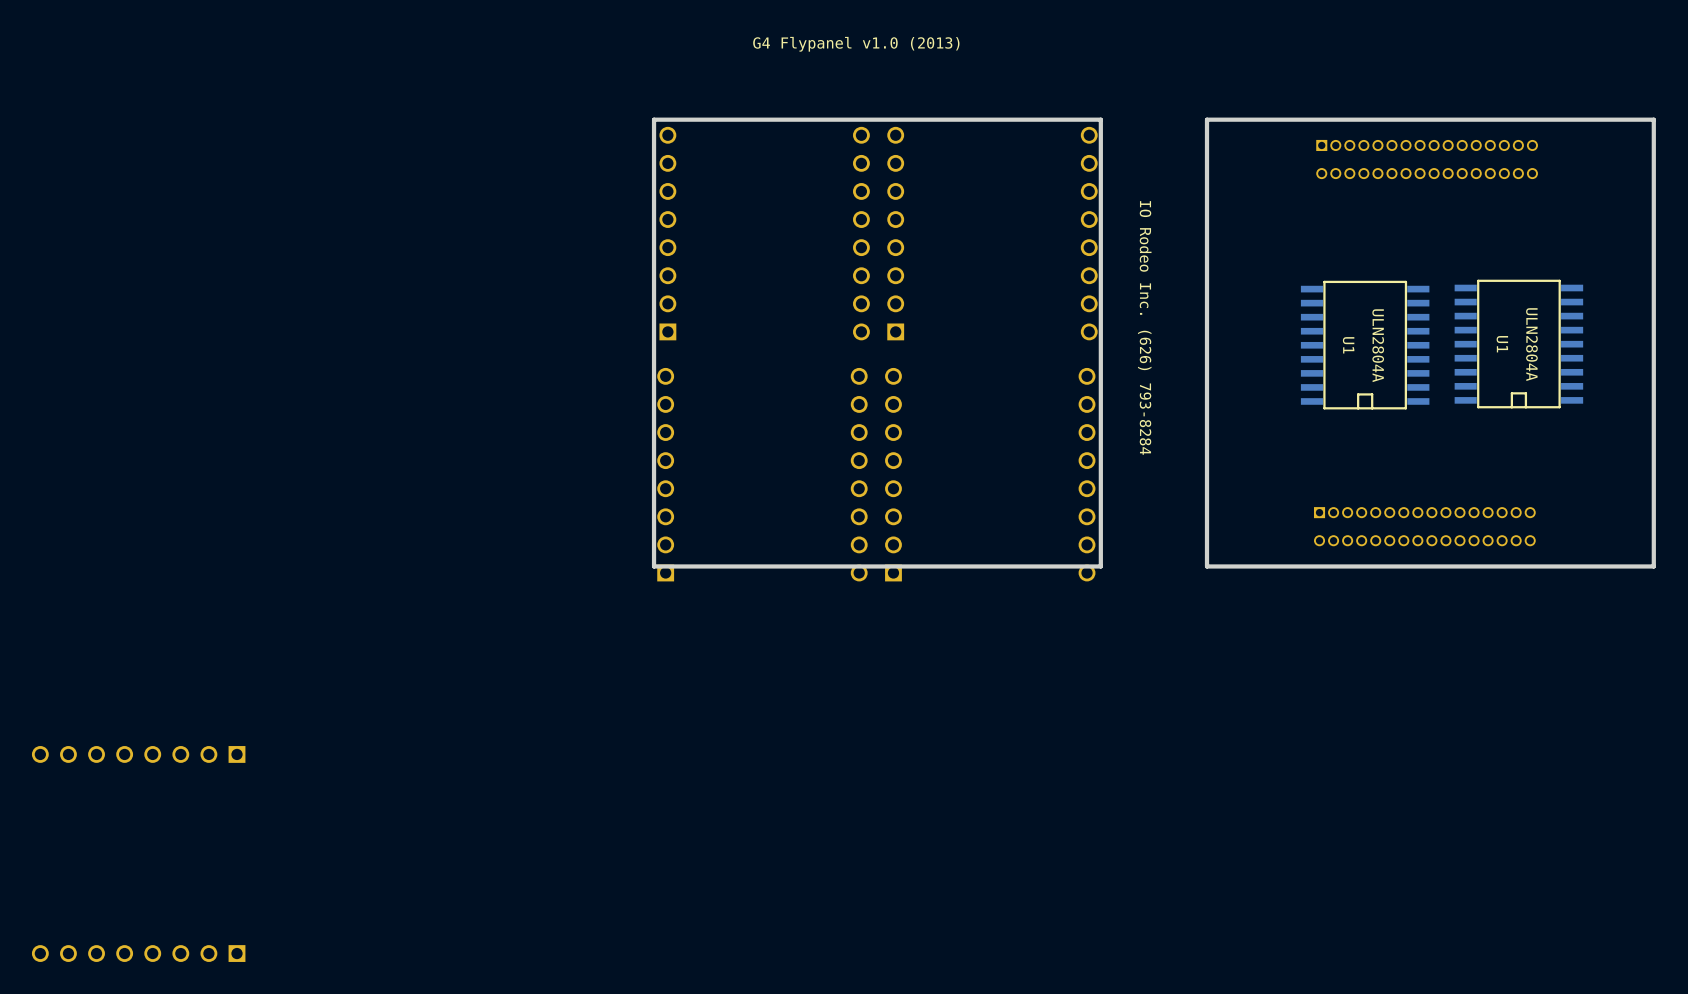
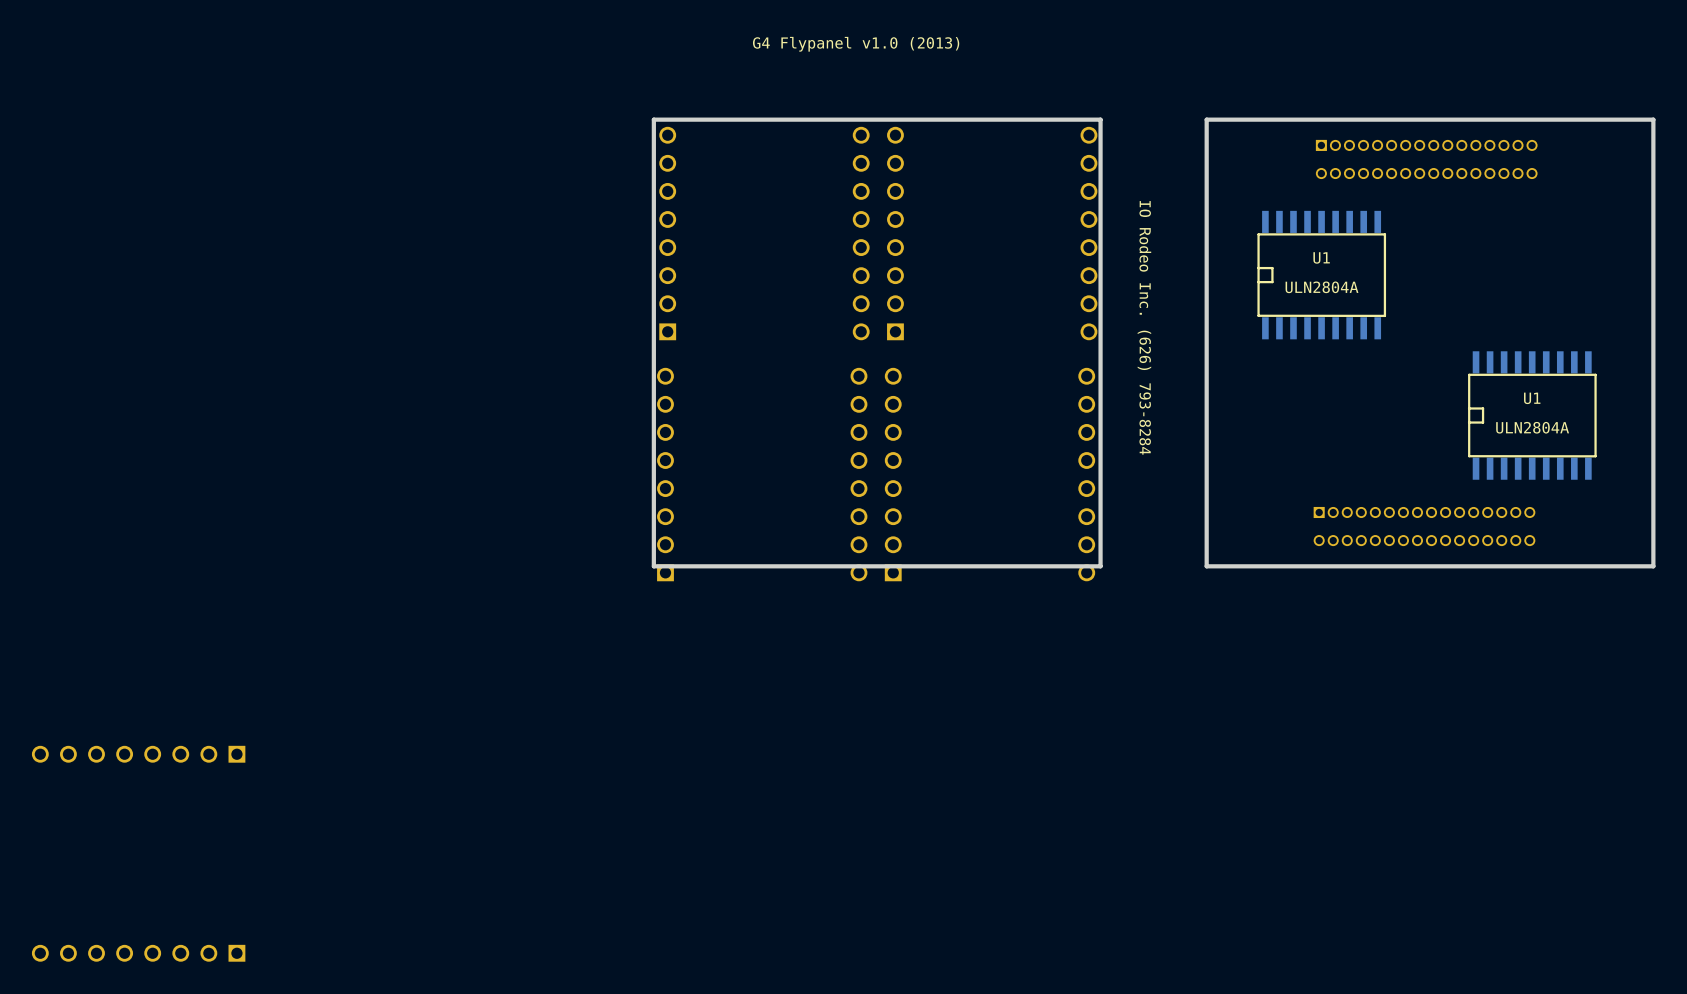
U1 rotation: 0° (1518, 344) -> 90° clockwise (1532, 415)
U1 rotation: 0° (1365, 345) -> 90° clockwise (1321, 275)
U1 position: (1365, 345) -> (1321, 275)

